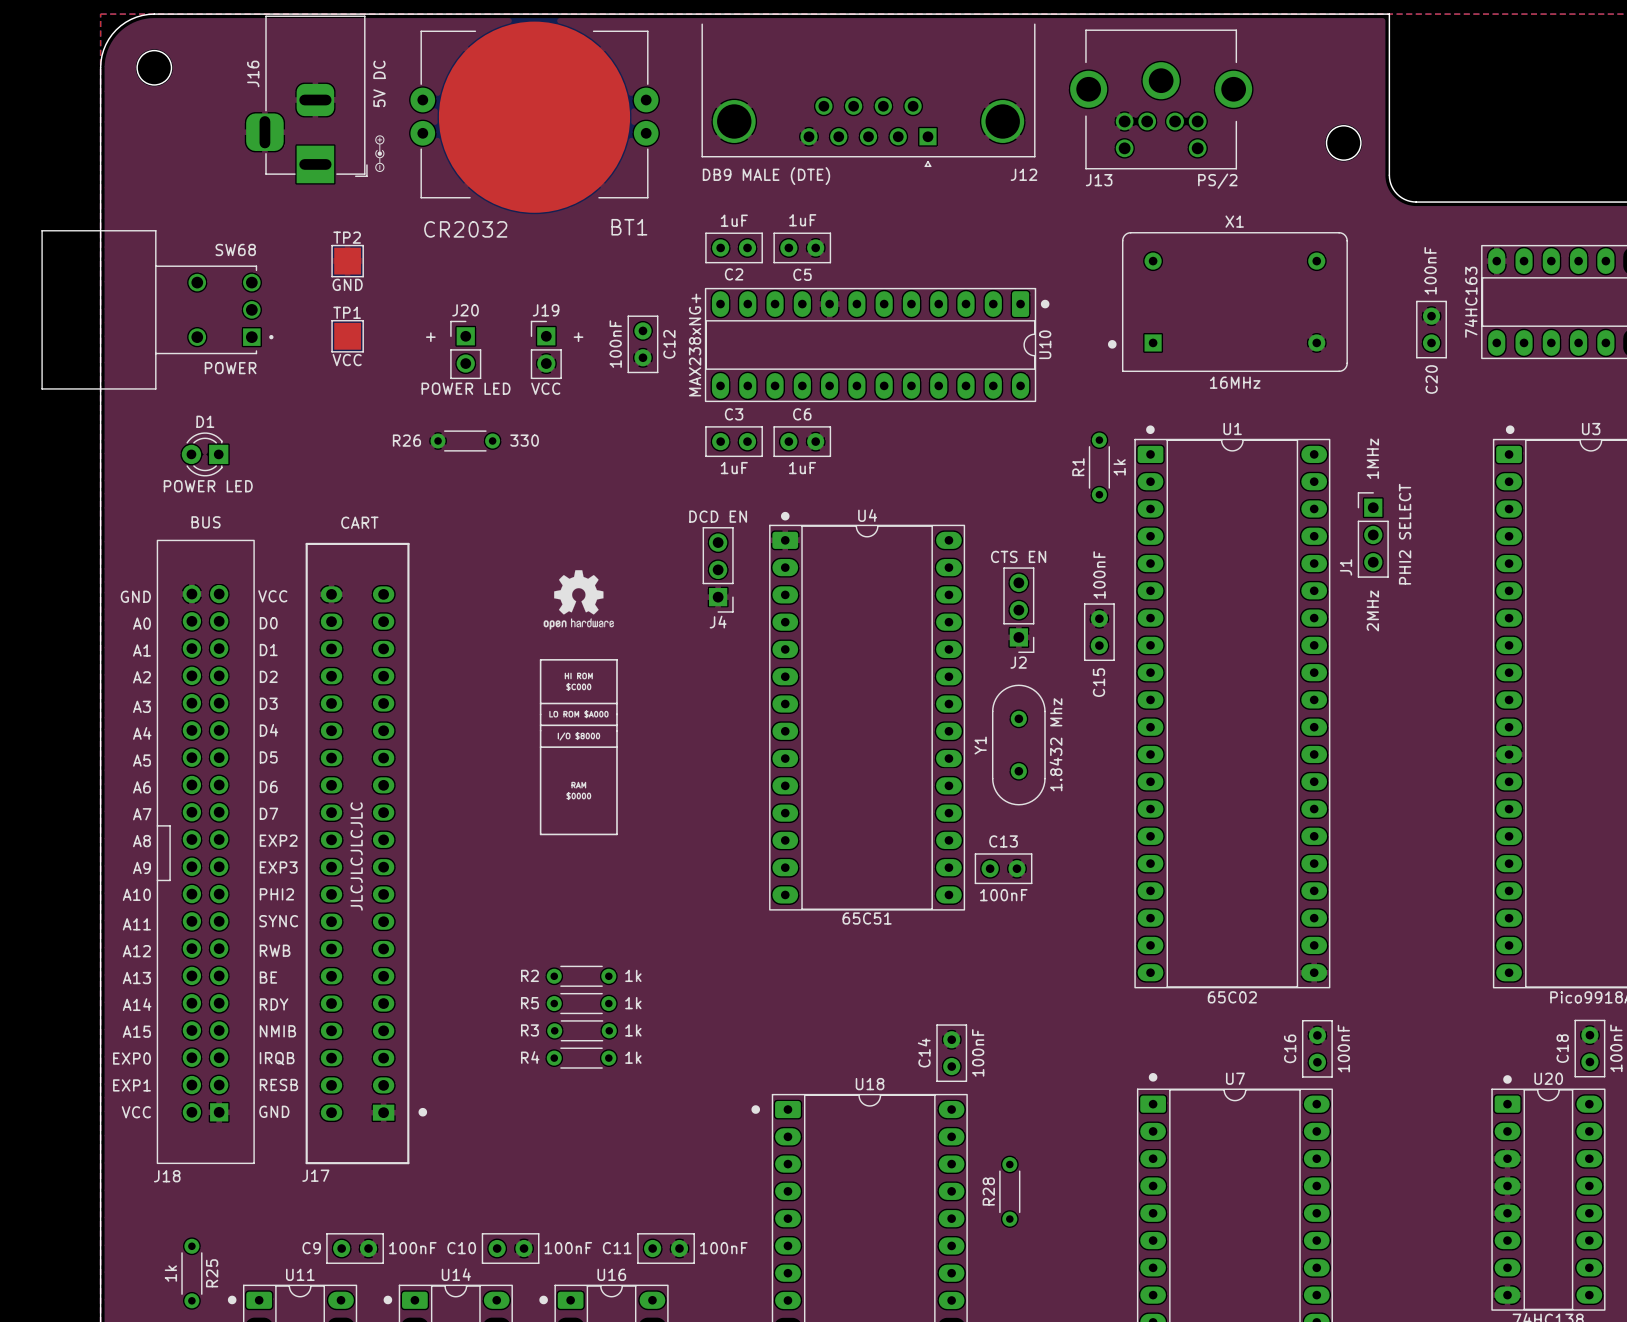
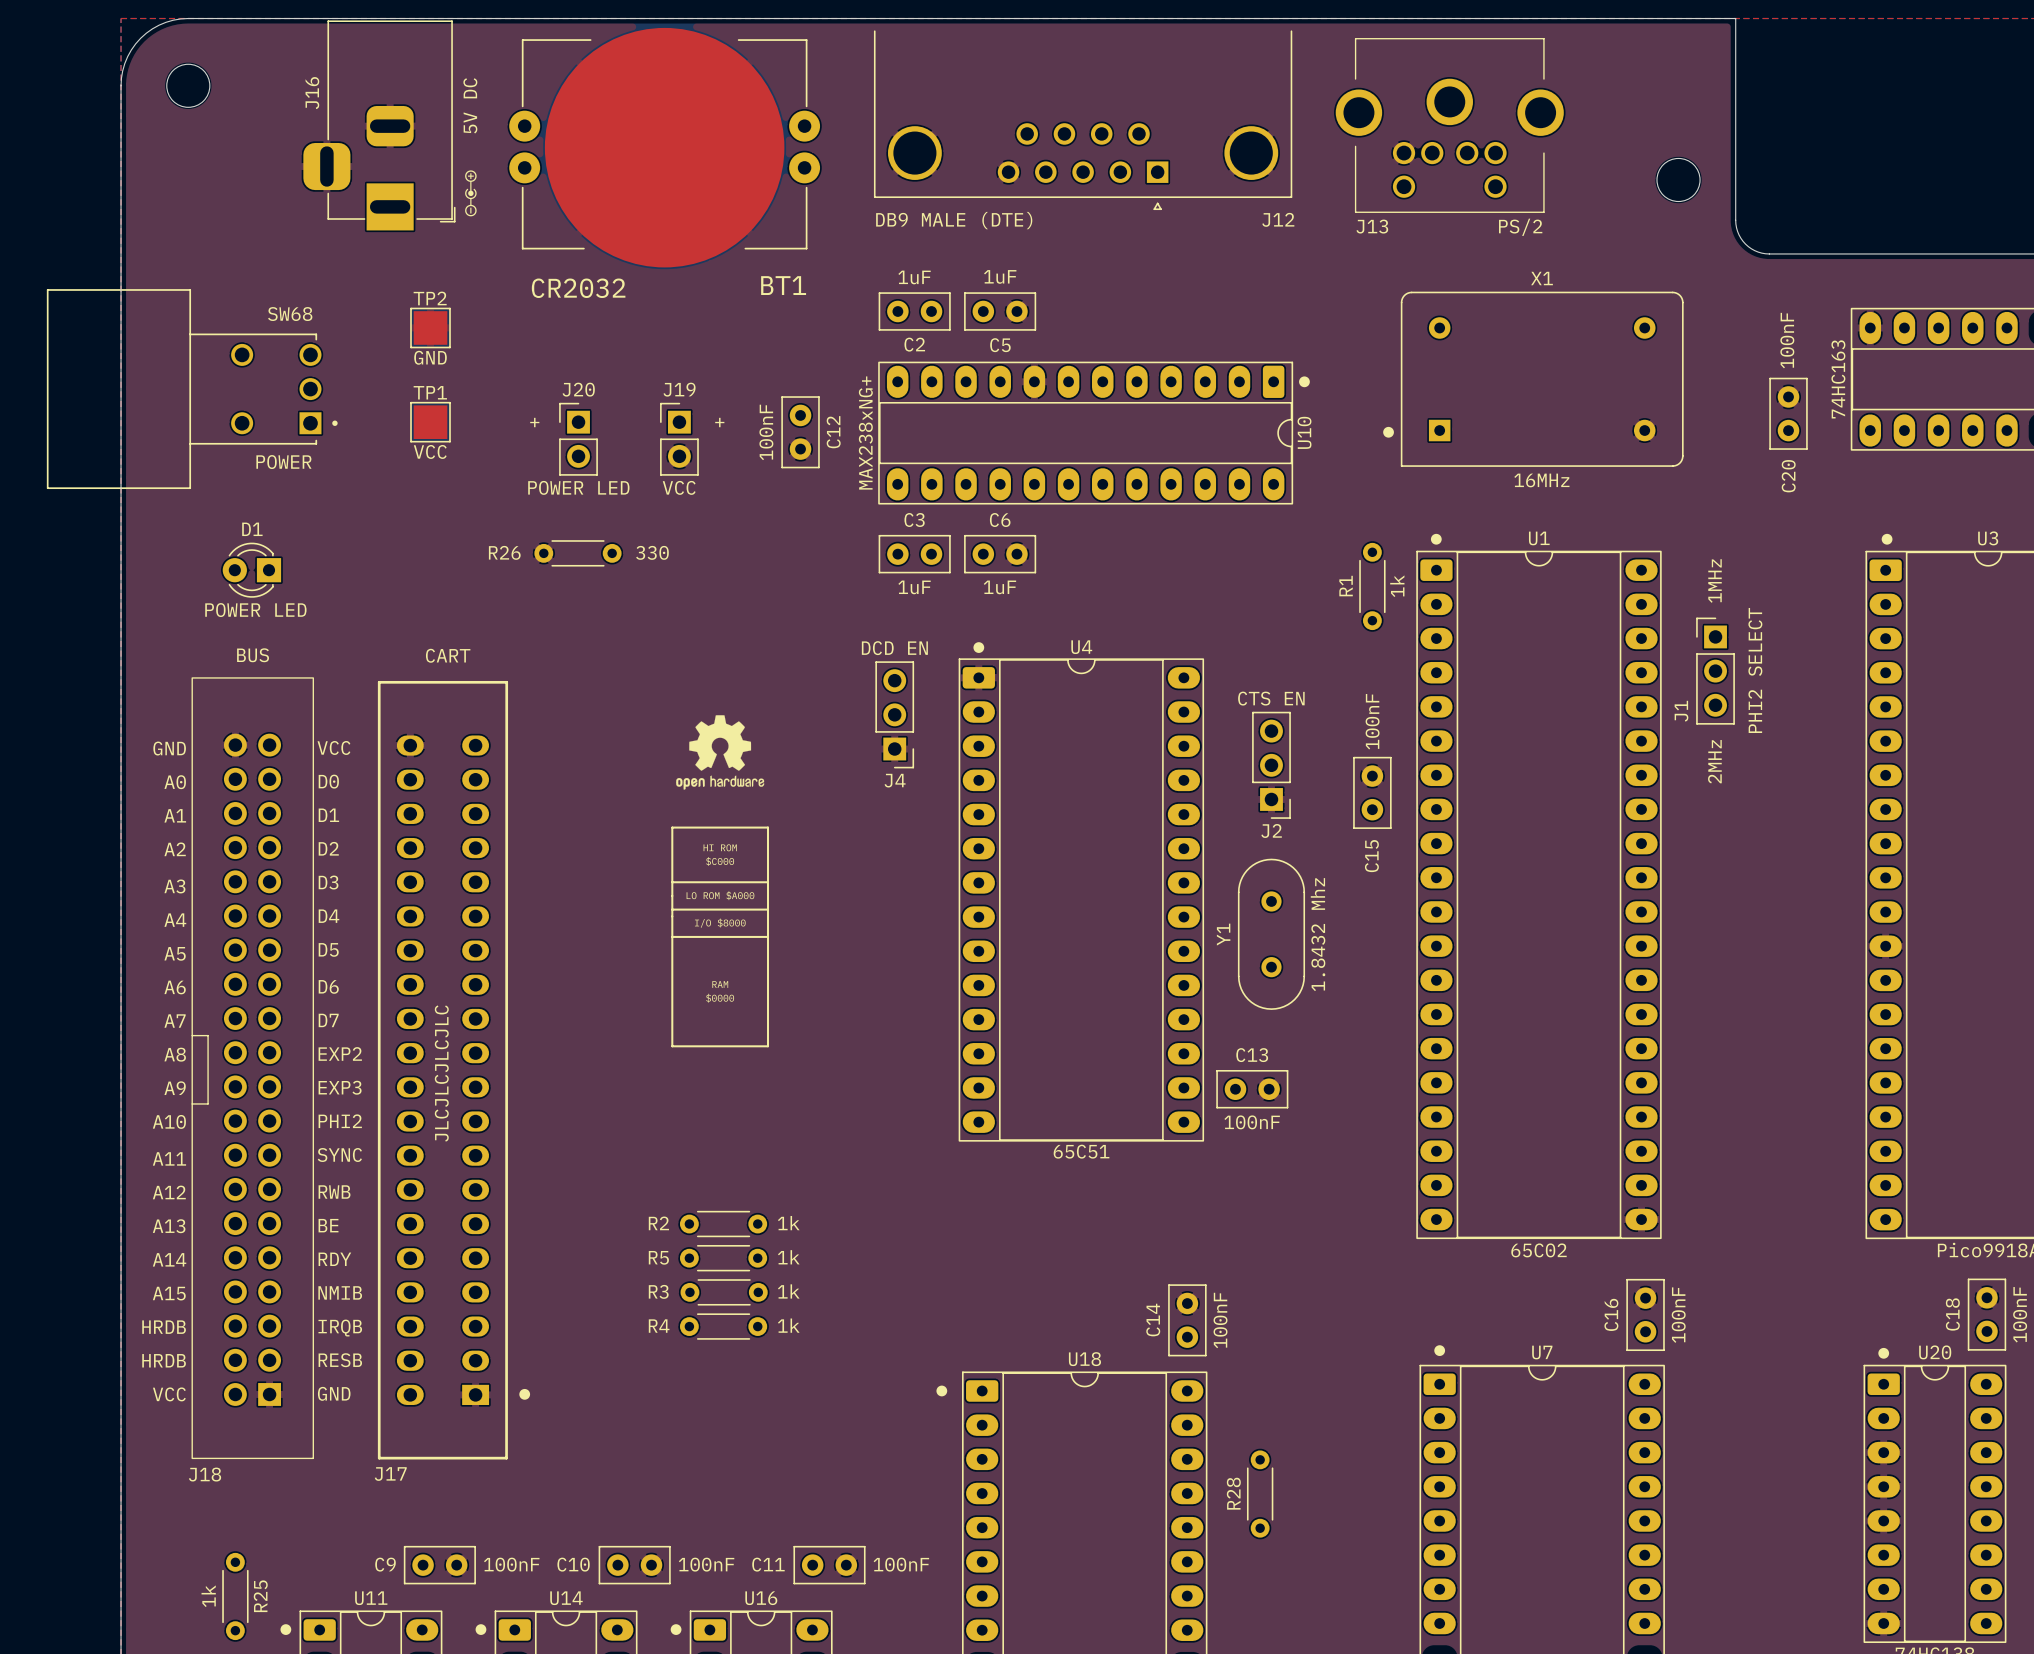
text: EXP0 (132, 1058) -> HRDB (164, 1327)
text: EXP1 (132, 1085) -> HRDB (164, 1360)

